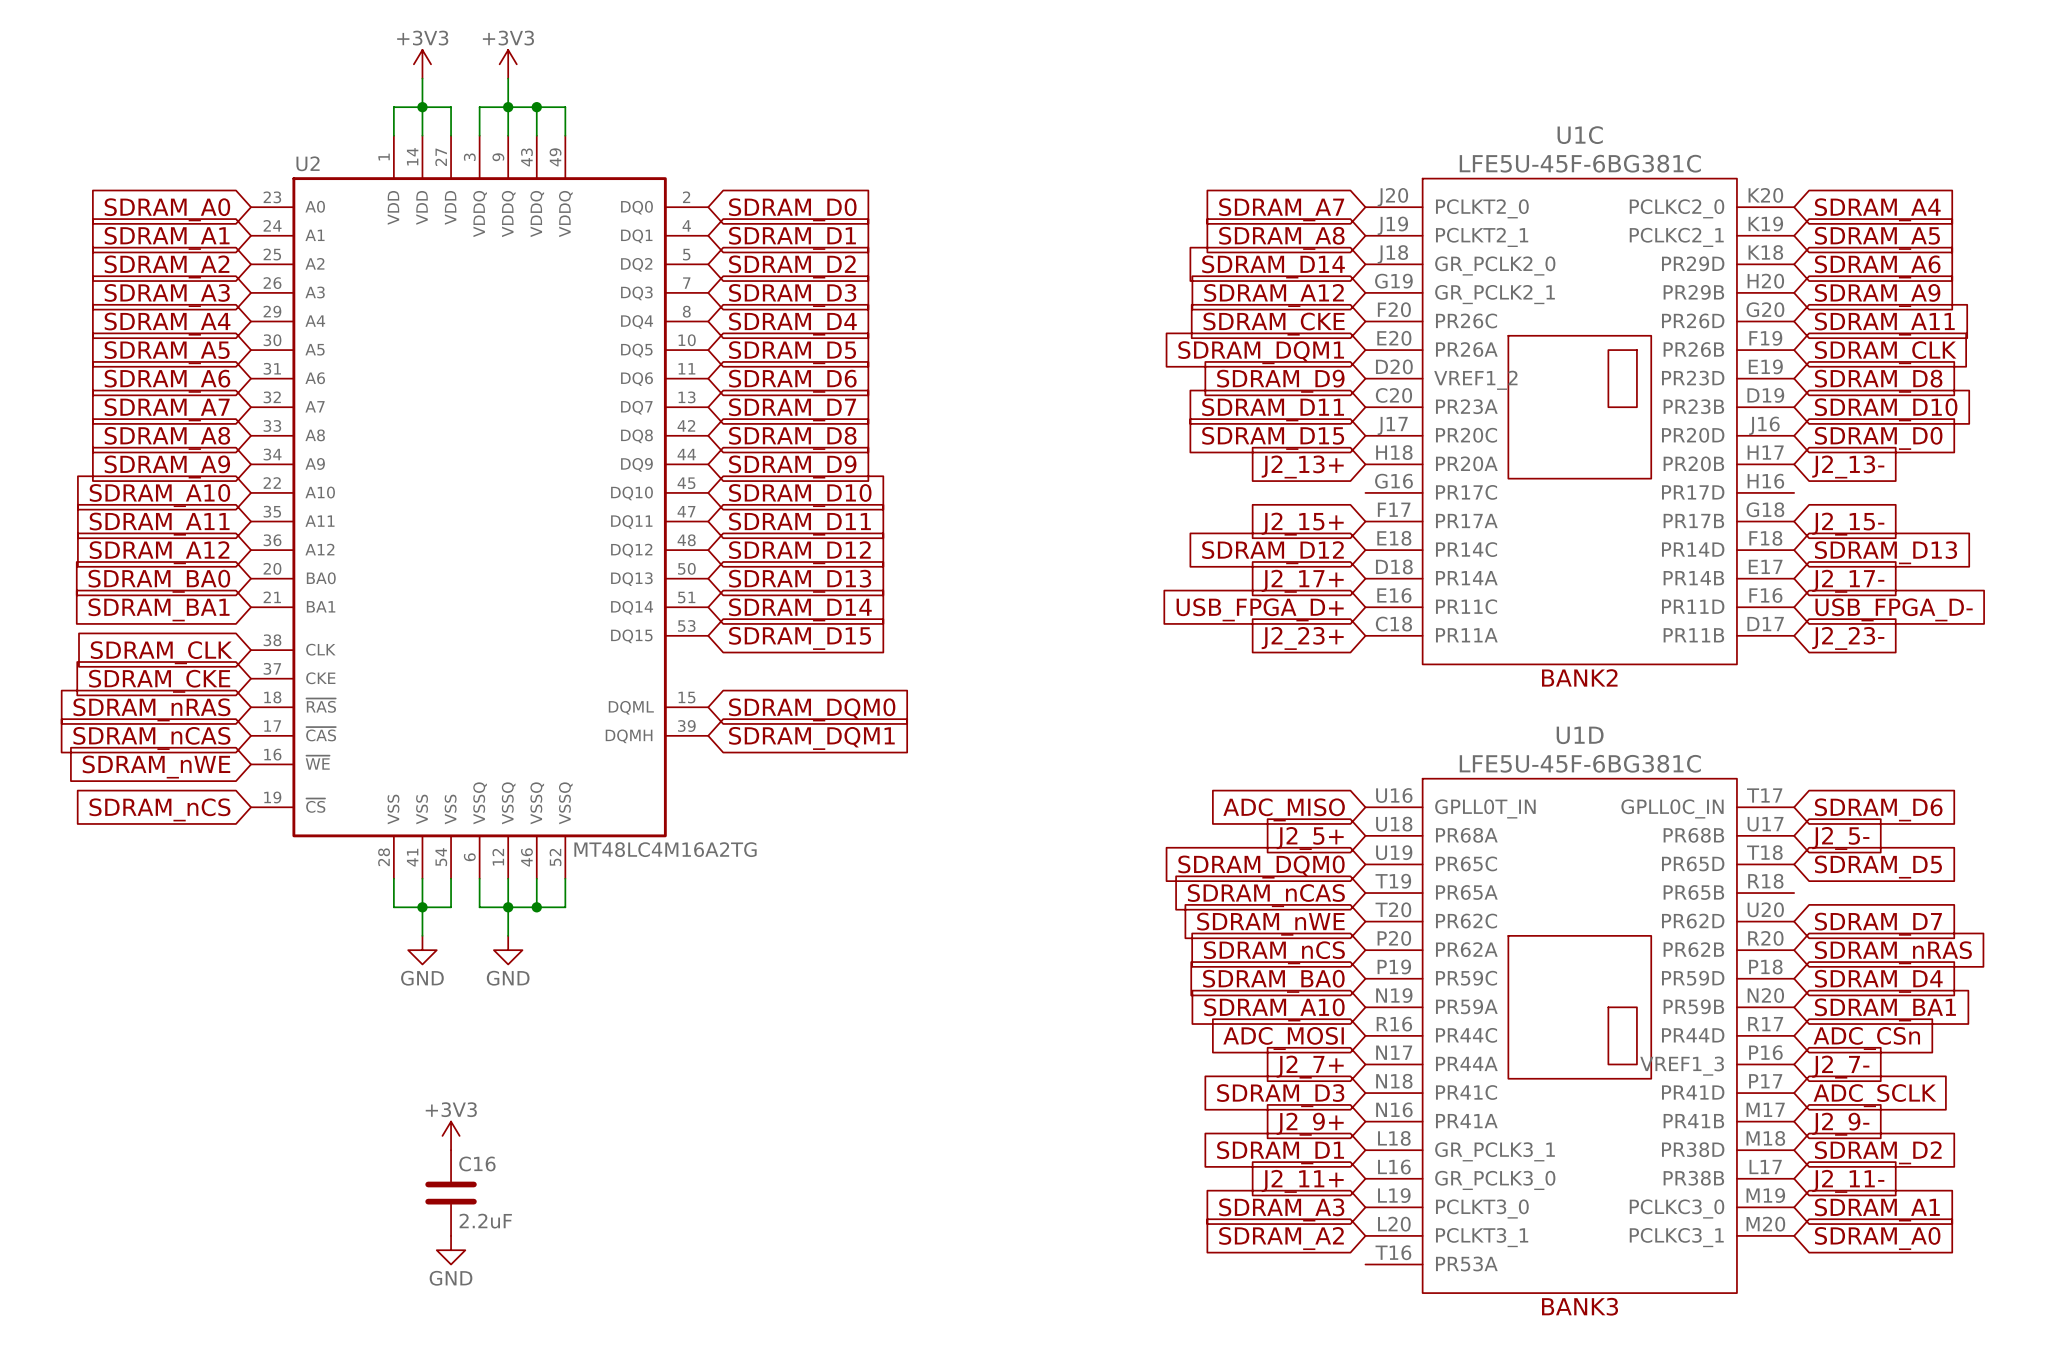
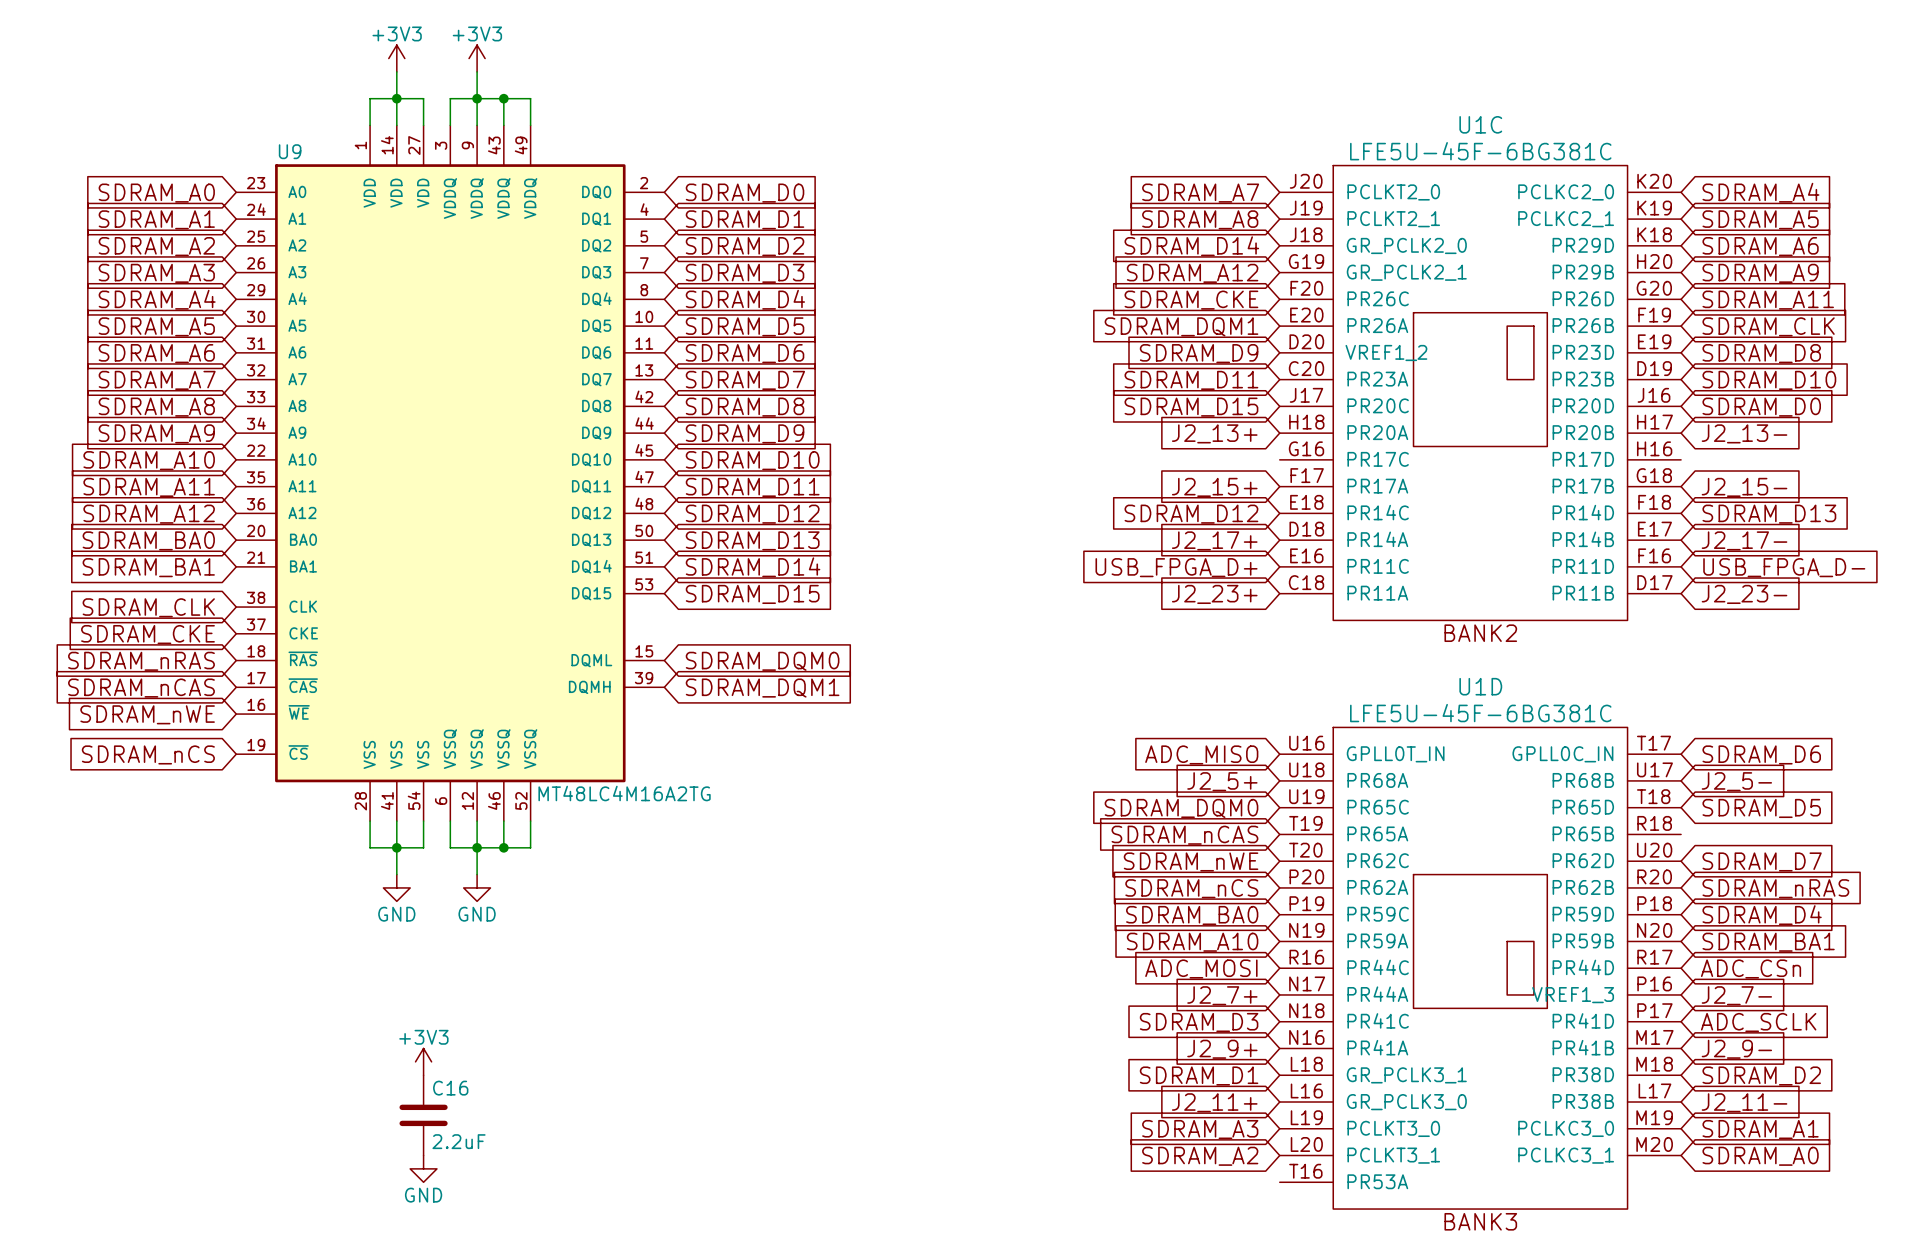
U2 name: U2 (308, 163) -> U9 (290, 151)

